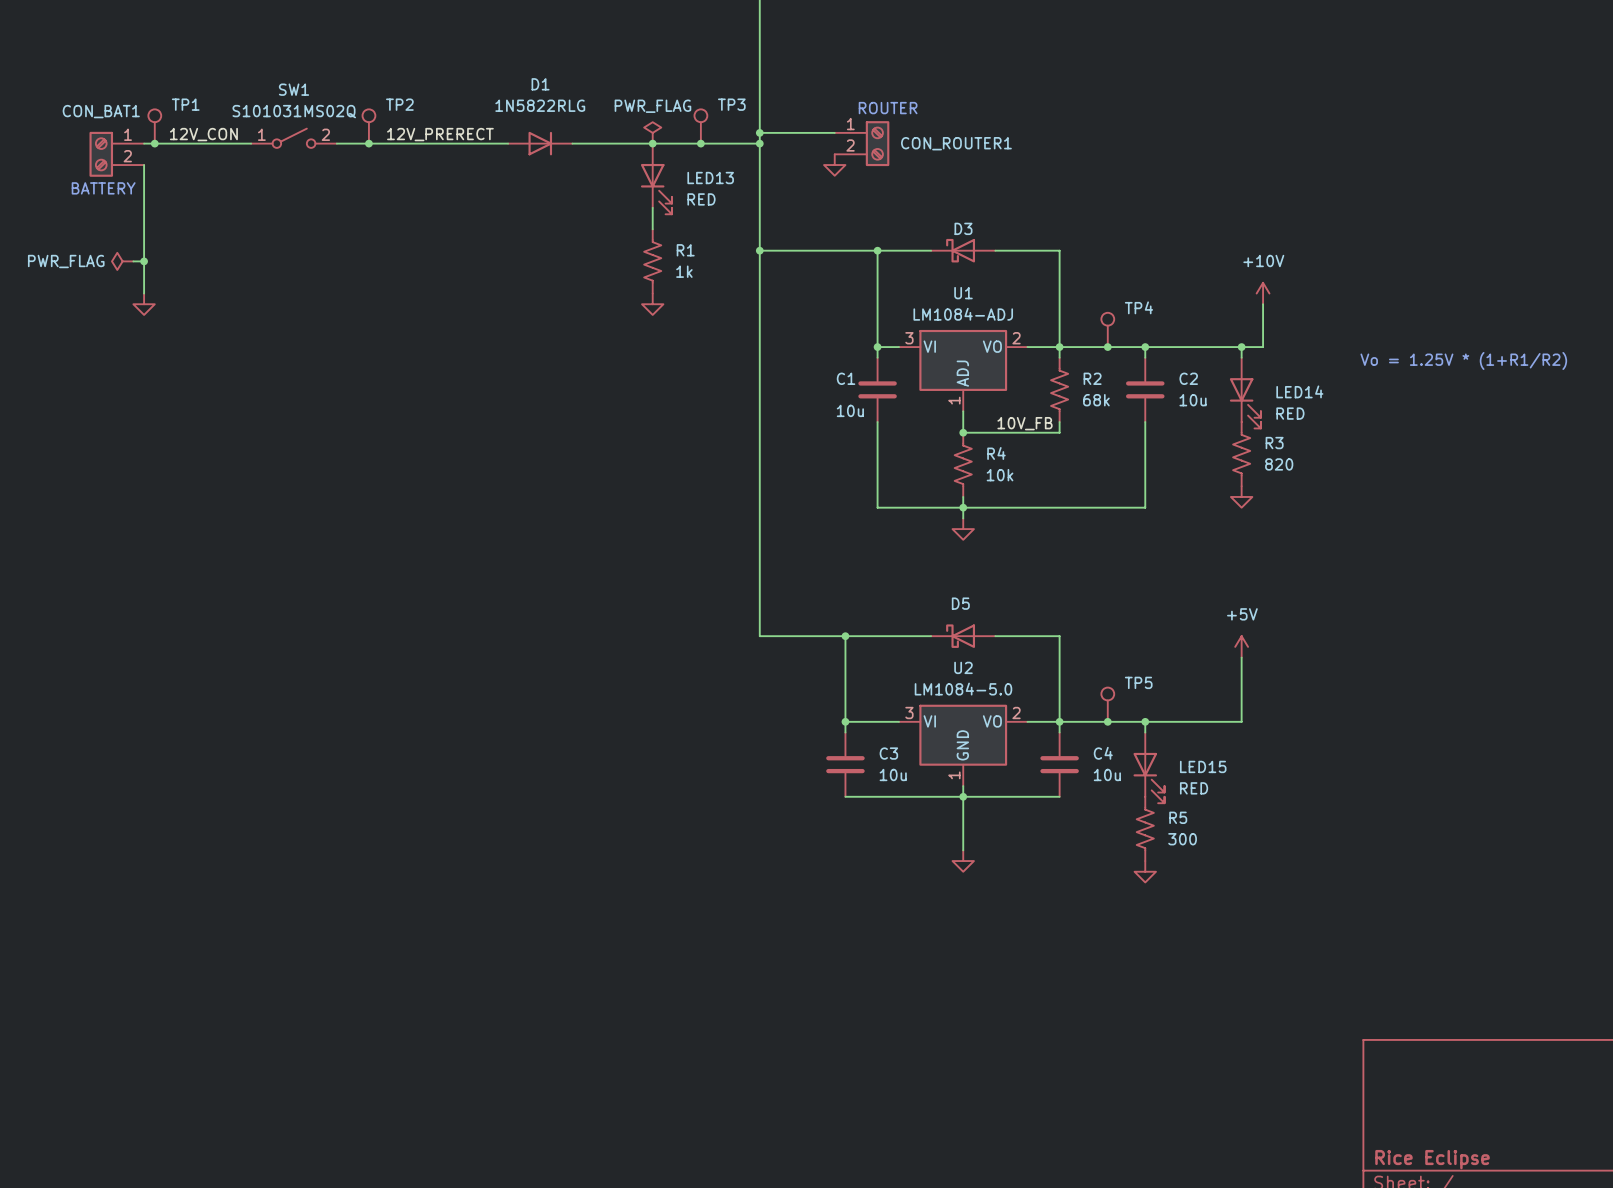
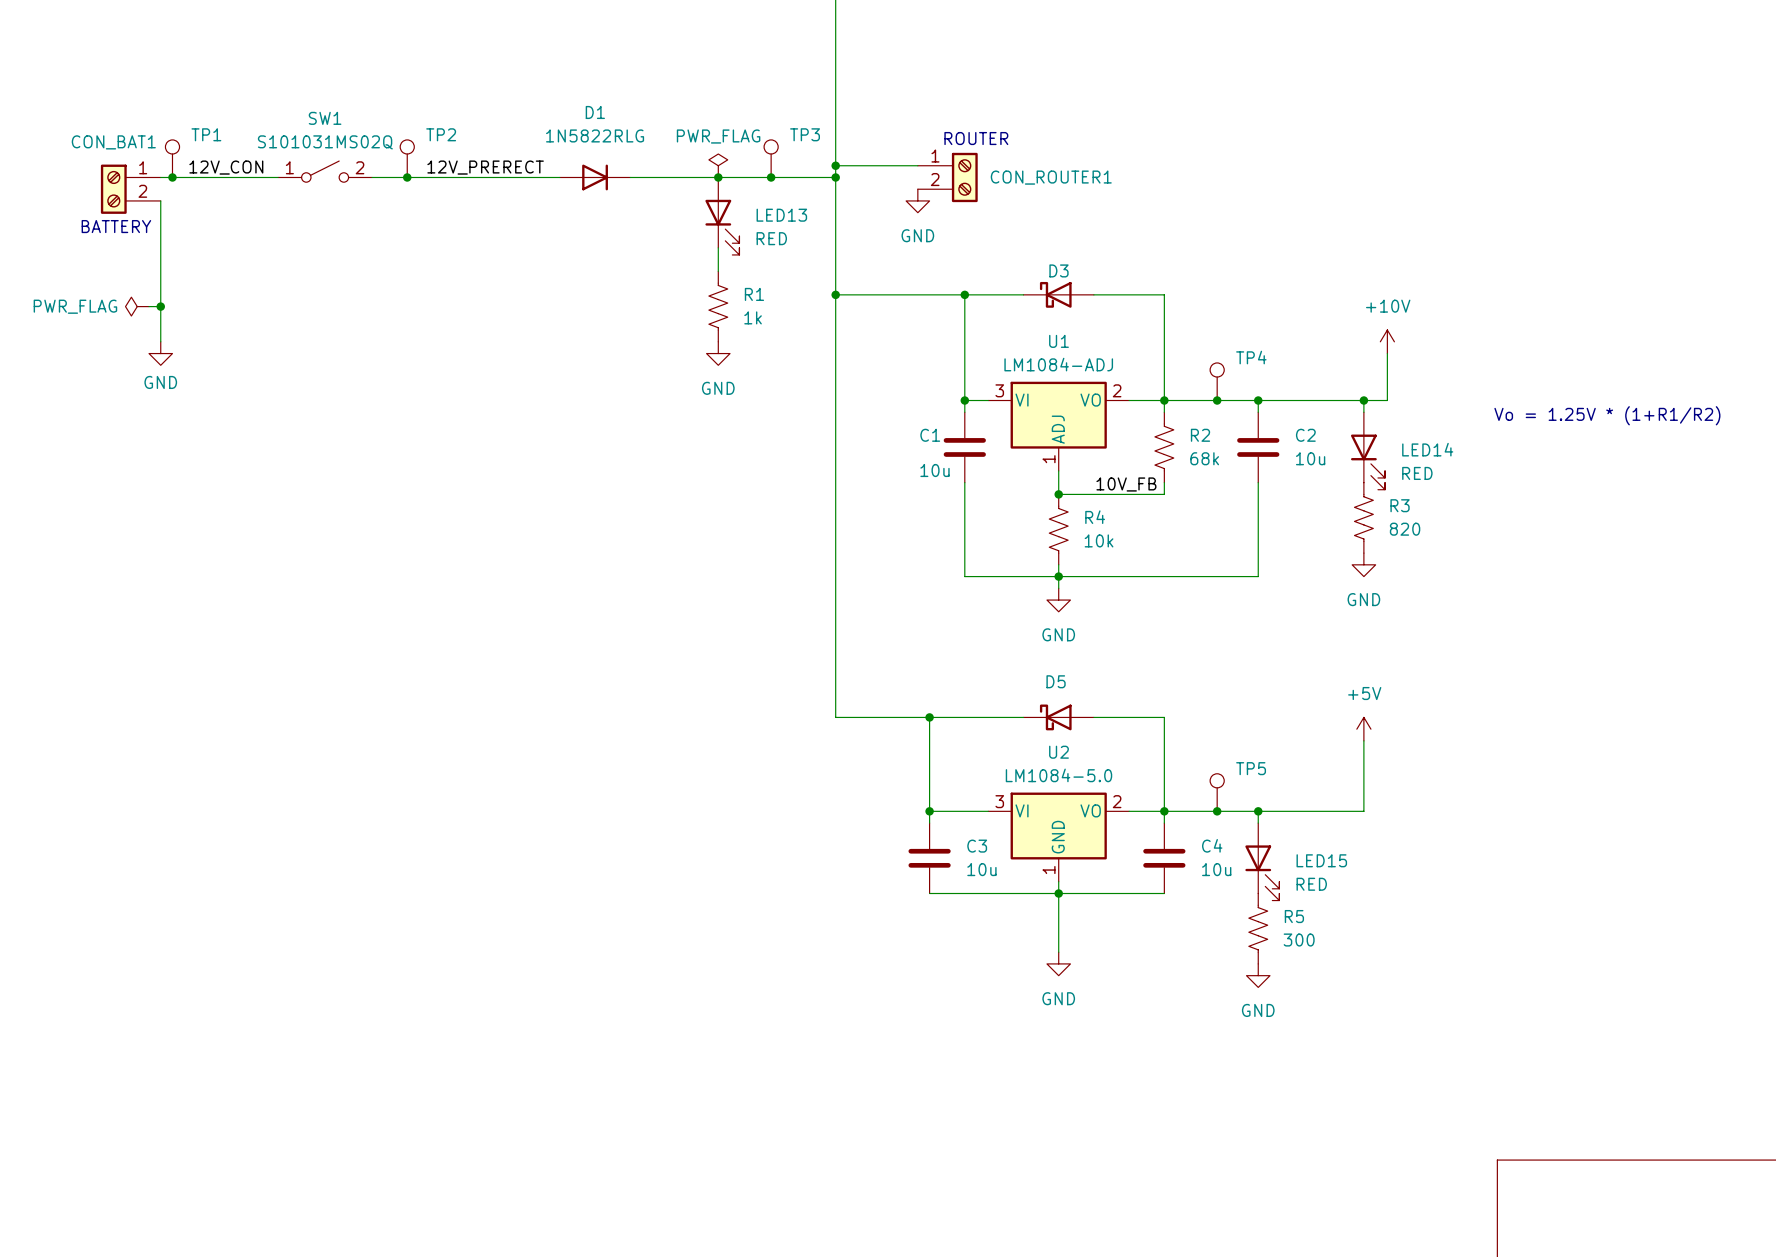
power symbol text: none -> GND (917, 235)
power symbol text: none -> GND (160, 382)
power symbol text: none -> GND (718, 388)
power symbol text: none -> GND (1363, 599)
power symbol text: none -> GND (1058, 634)
power symbol text: none -> GND (1058, 998)
power symbol text: none -> GND (1258, 1010)

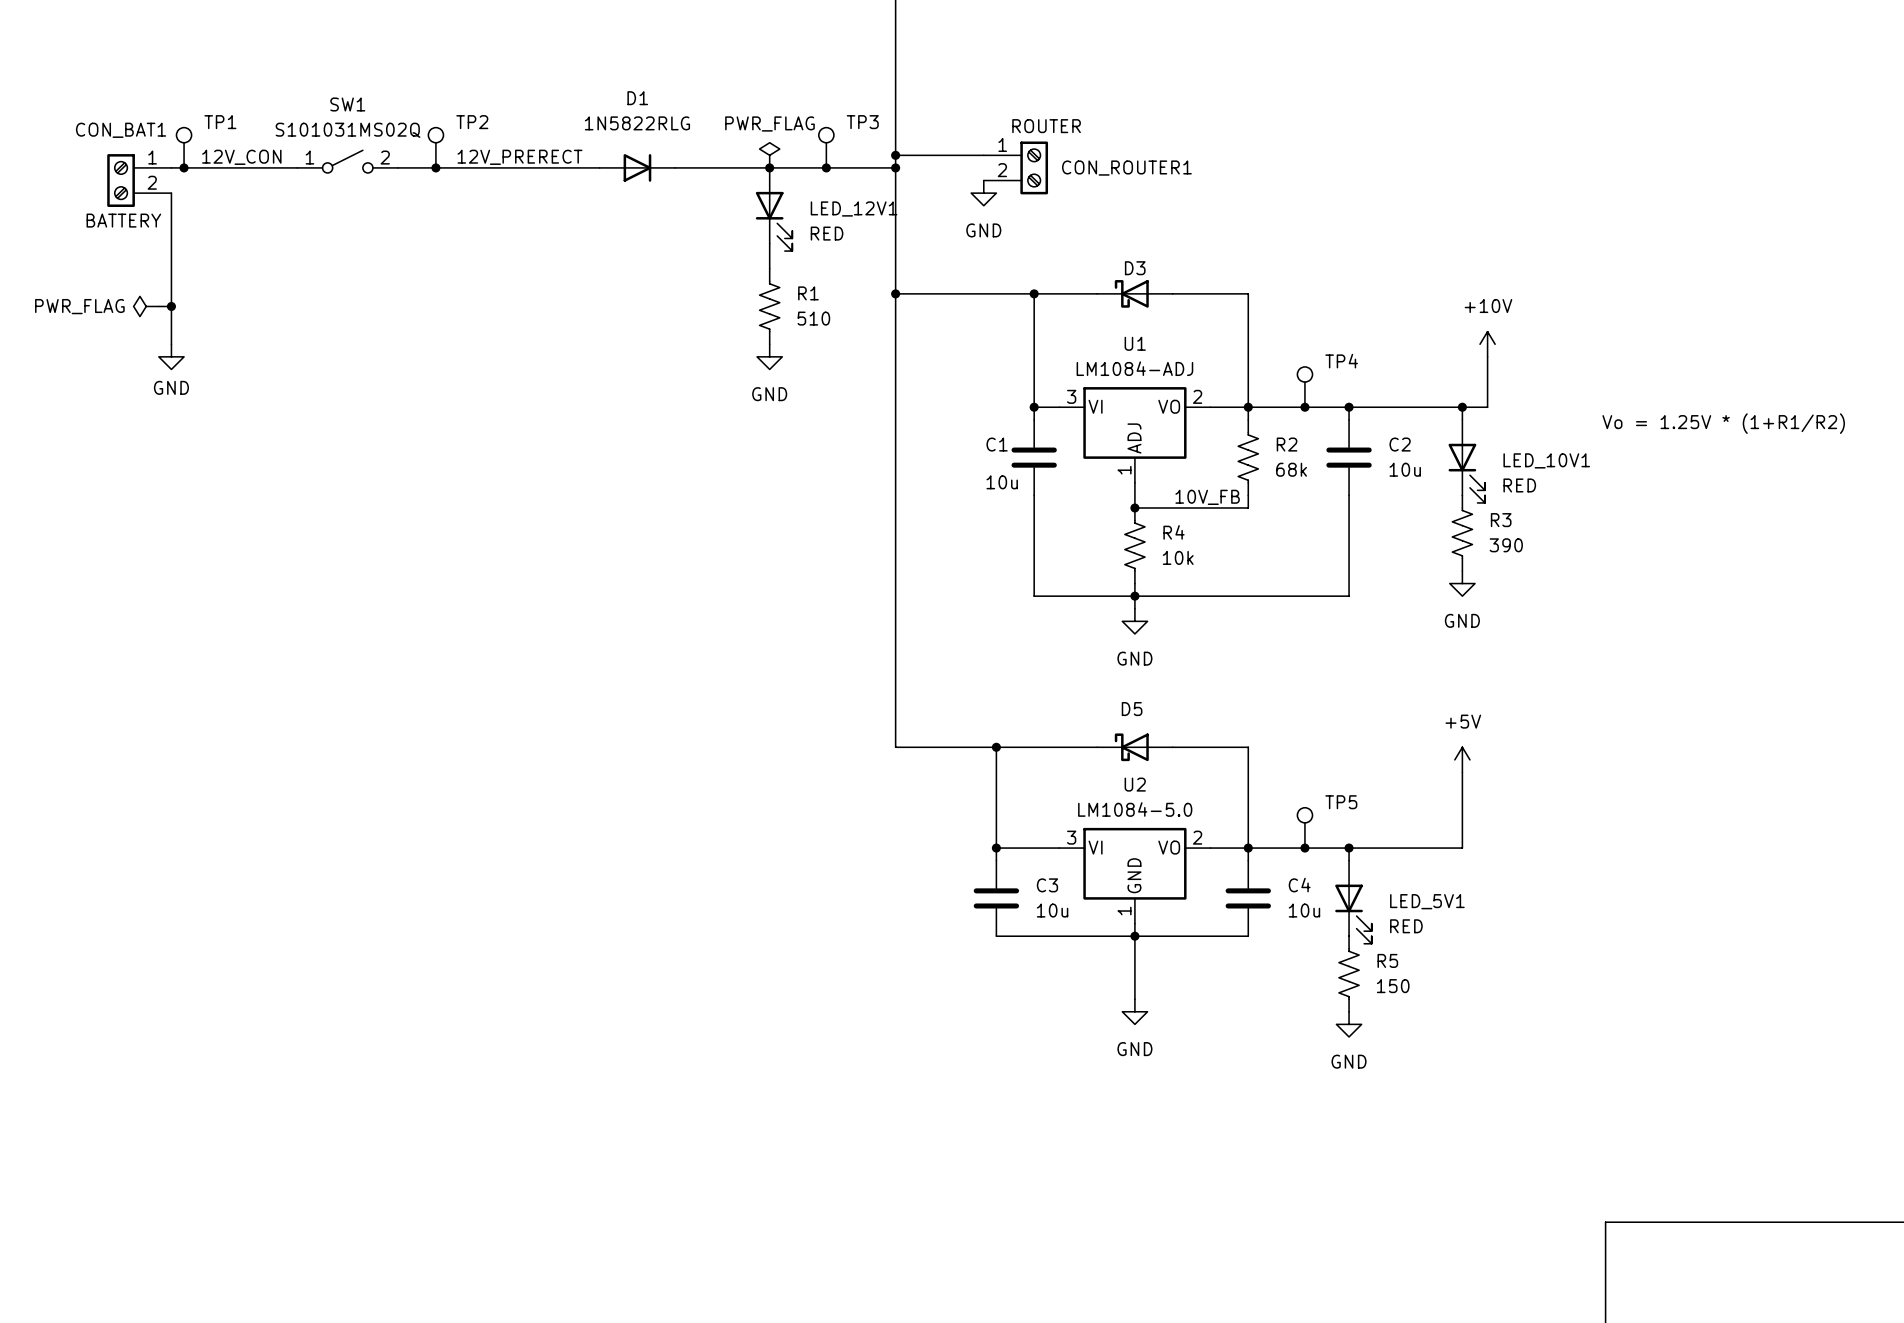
LED13 name: LED13 (781, 215) -> LED_12V1 (854, 209)
R1 value: 1k (753, 317) -> 510 (813, 318)
LED14 name: LED14 (1427, 449) -> LED_10V1 (1546, 460)
R3 value: 820 (1405, 529) -> 390 (1506, 545)
LED15 name: LED15 (1321, 860) -> LED_5V1 (1427, 901)
R5 value: 300 (1299, 940) -> 150 (1393, 986)

